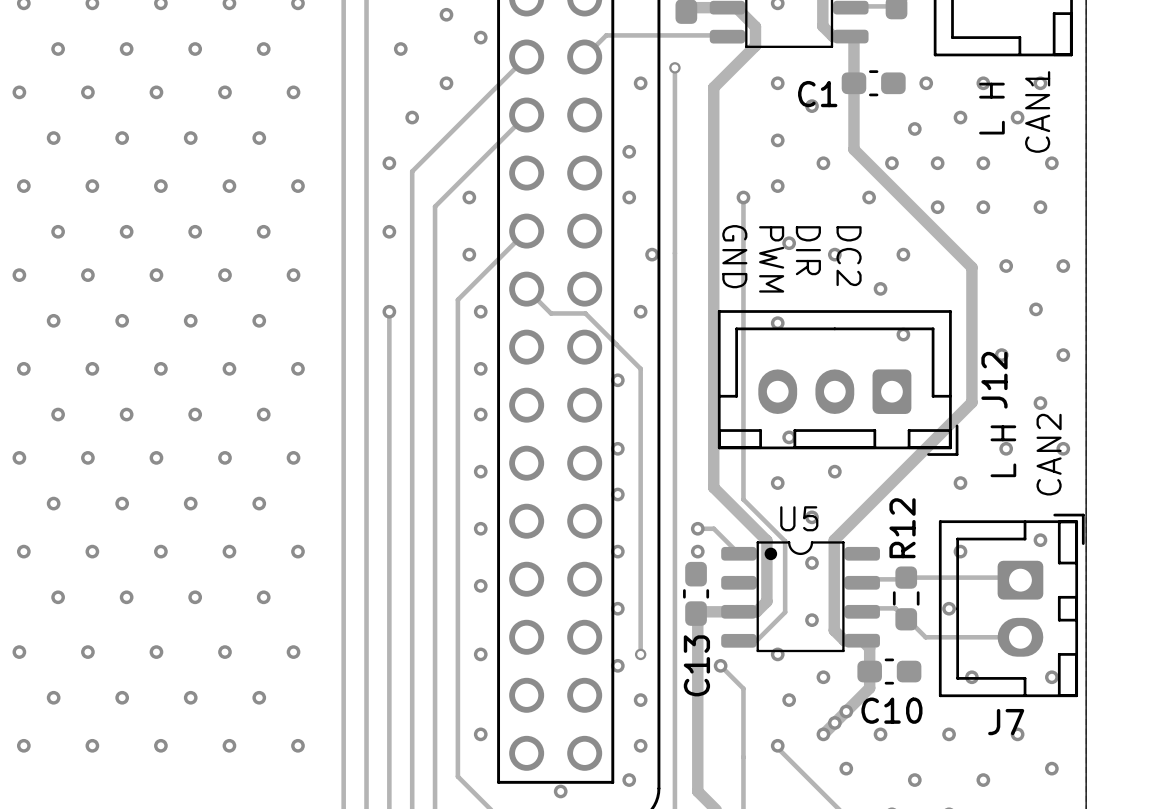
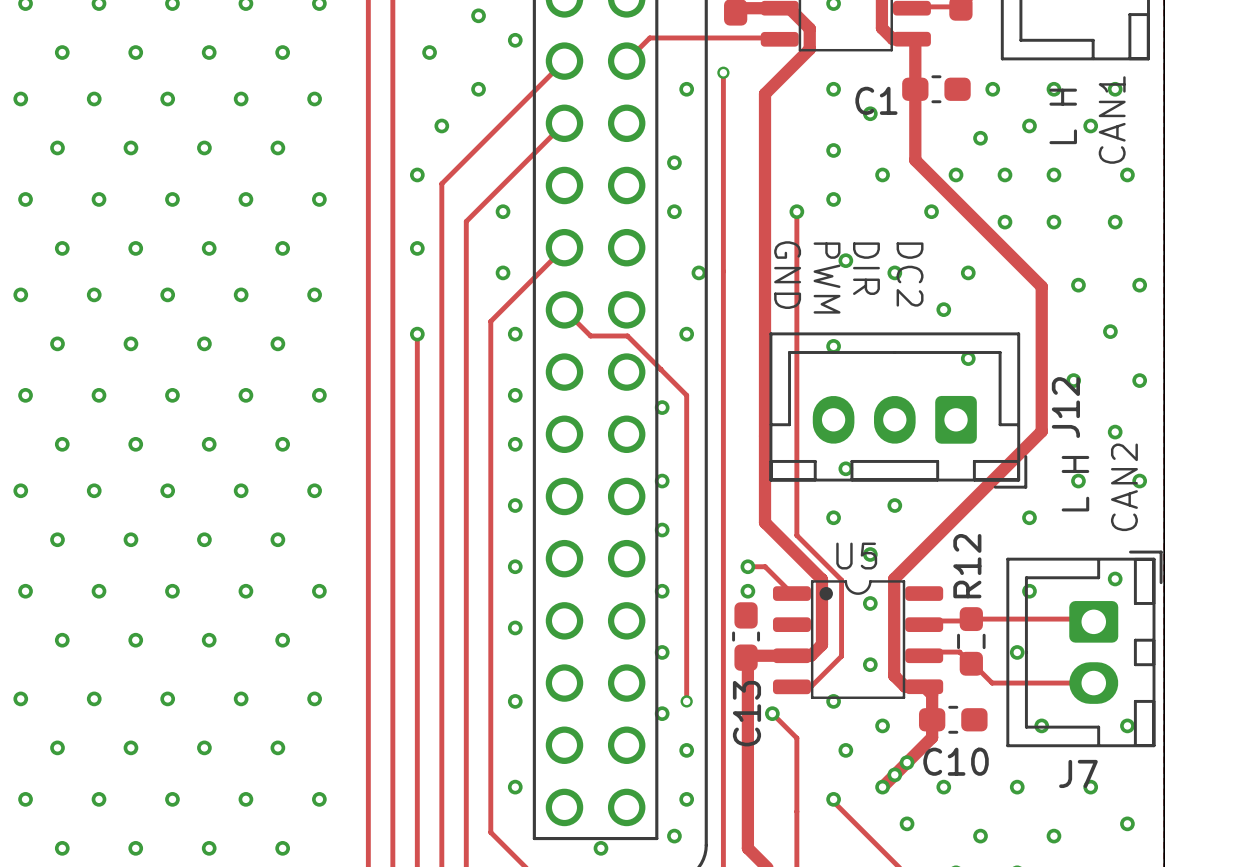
via: none -> (62, 848)
via: none -> (135, 848)
via: none -> (209, 848)
via: none -> (282, 848)

